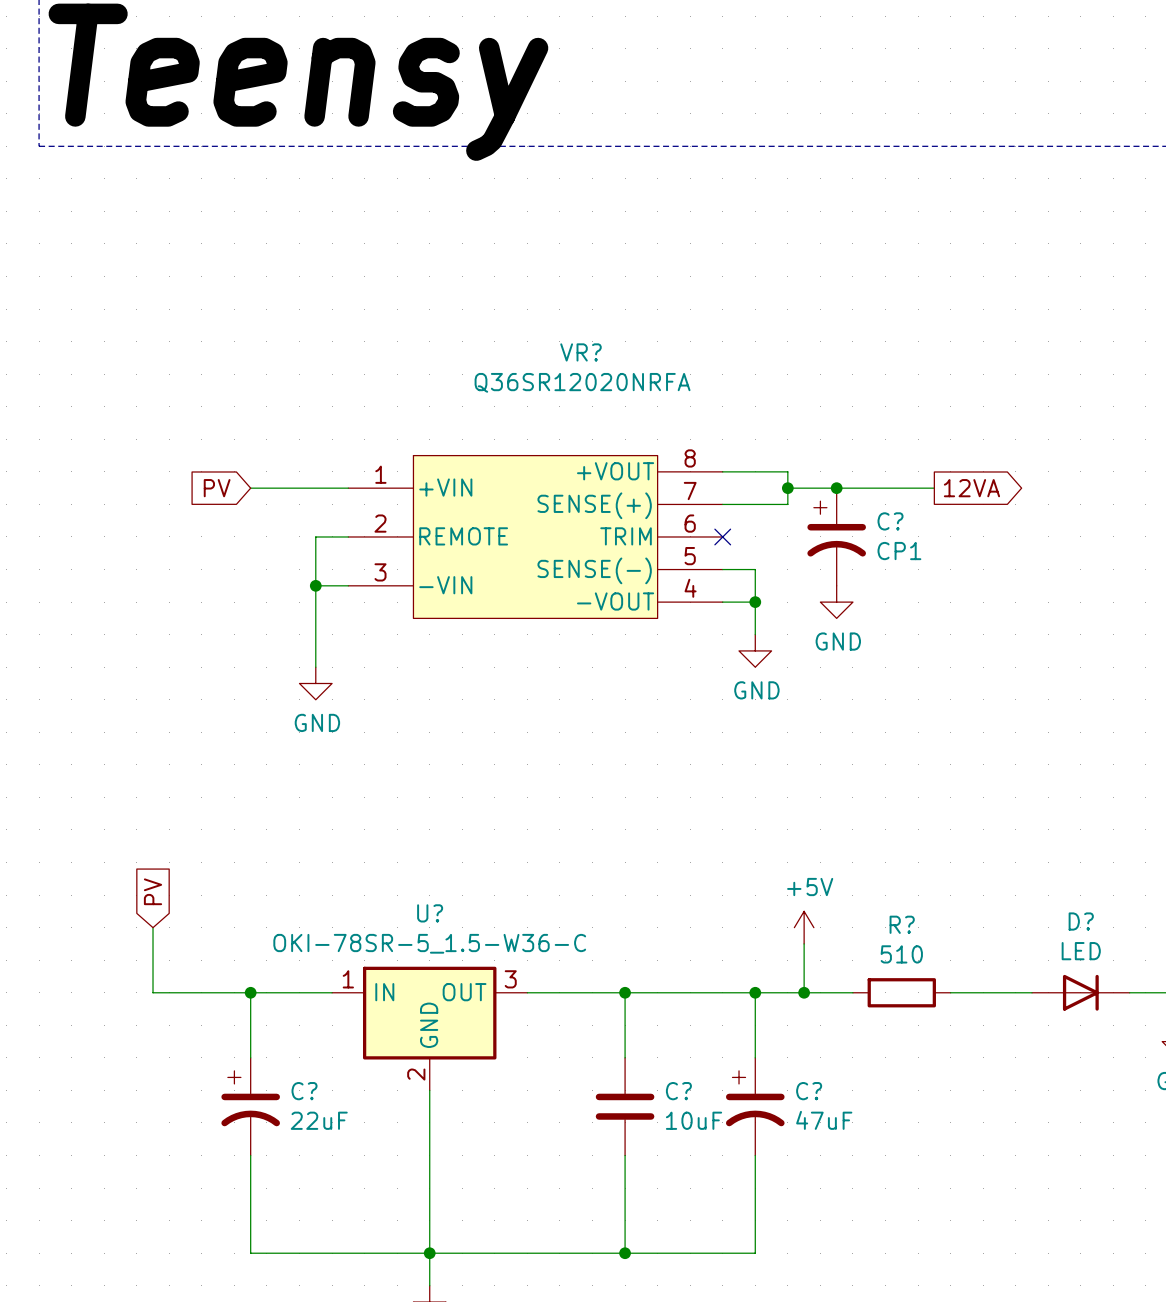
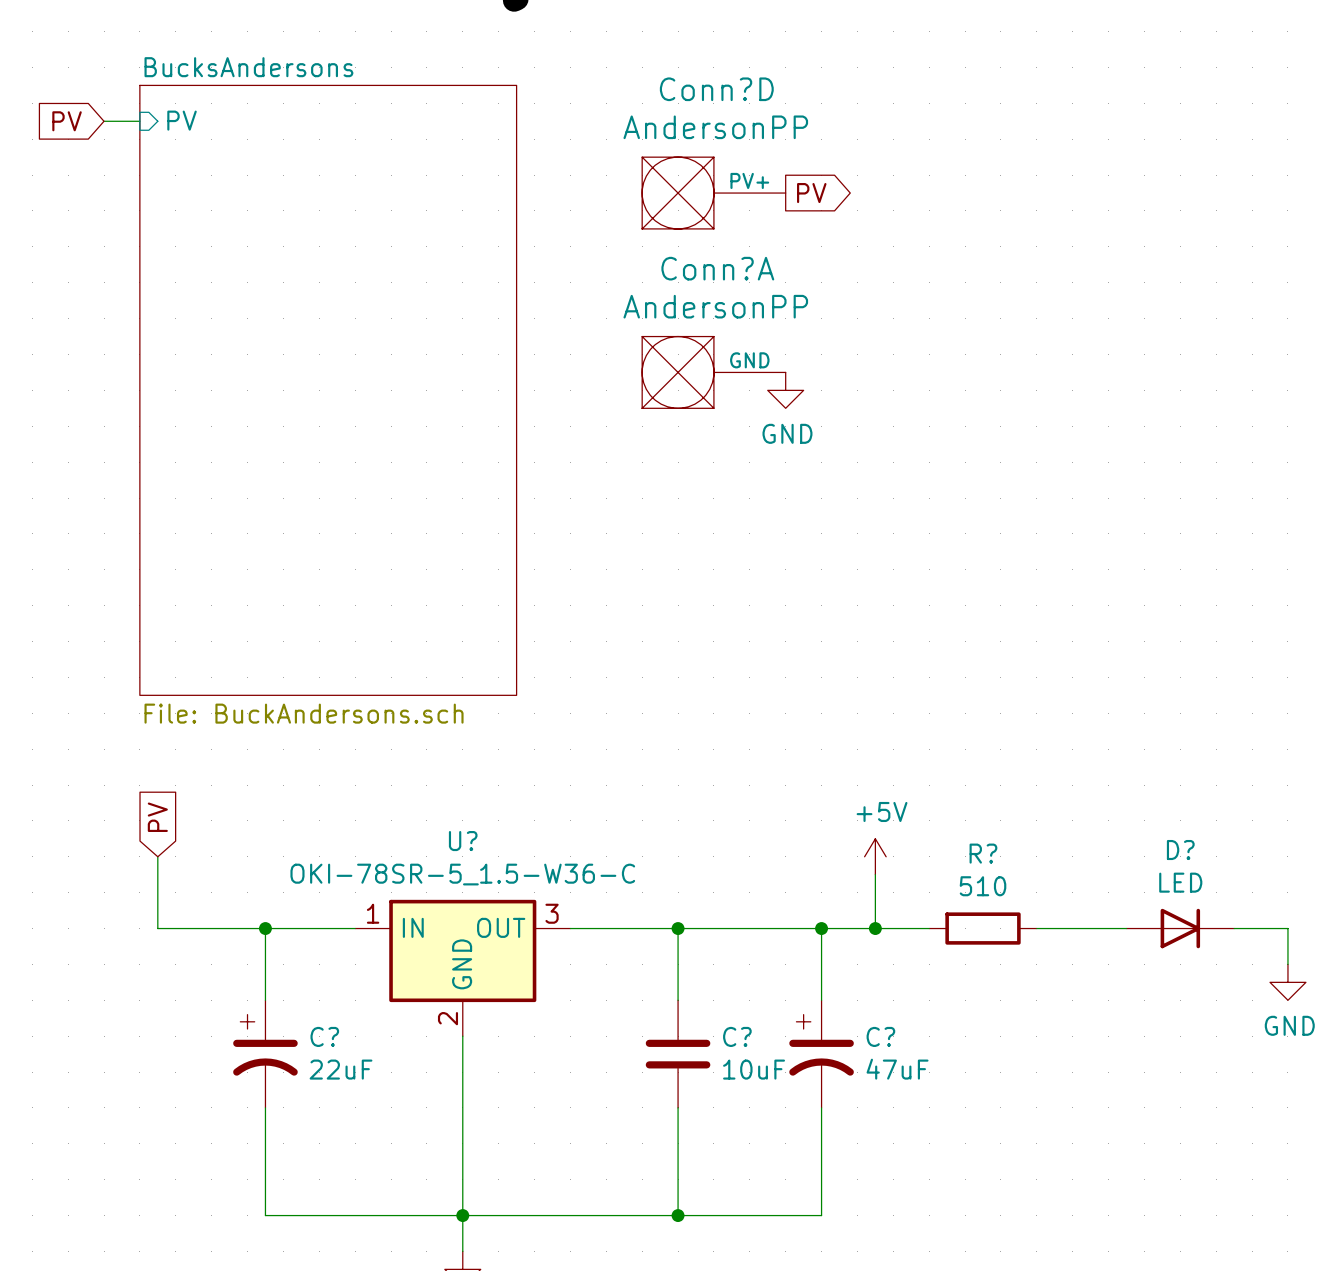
sheet pin: none -> PV (182, 120)
global label: none -> PV (67, 121)
wire: none -> (104, 121) (139, 121)
Conn?D: none -> AndersonPP (713, 193)
global label: none -> PV (811, 193)
wire: (722, 471) (787, 471) (787, 504) (722, 504) -> none
global label: PV (217, 488) -> none
wire: (250, 488) (348, 488) -> none
Conn?A: none -> AndersonPP (713, 372)
wire: (787, 488) (934, 488) -> none
junction: (787, 488) -> none
junction: (836, 488) -> none
global label: 12VA (971, 488) -> none
sheet BucksAndersons: none -> File: BuckAndersons.sch (328, 390)
power symbol: none -> GND (785, 390)
VR?: Q36SR12020NRFA (584, 512) -> none
wire: (348, 536) (315, 536) (315, 667) -> none
no-connect mark: (722, 536) -> none
C?: CP1 (836, 536) -> none
wire: (722, 569) (755, 569) (755, 634) -> none
wire: (315, 585) (348, 585) -> none
junction: (315, 585) -> none
wire: (722, 602) (755, 602) -> none
junction: (755, 602) -> none
power symbol: GND (836, 602) -> none
power symbol: GND (755, 650) -> none
power symbol: GND (315, 683) -> none

